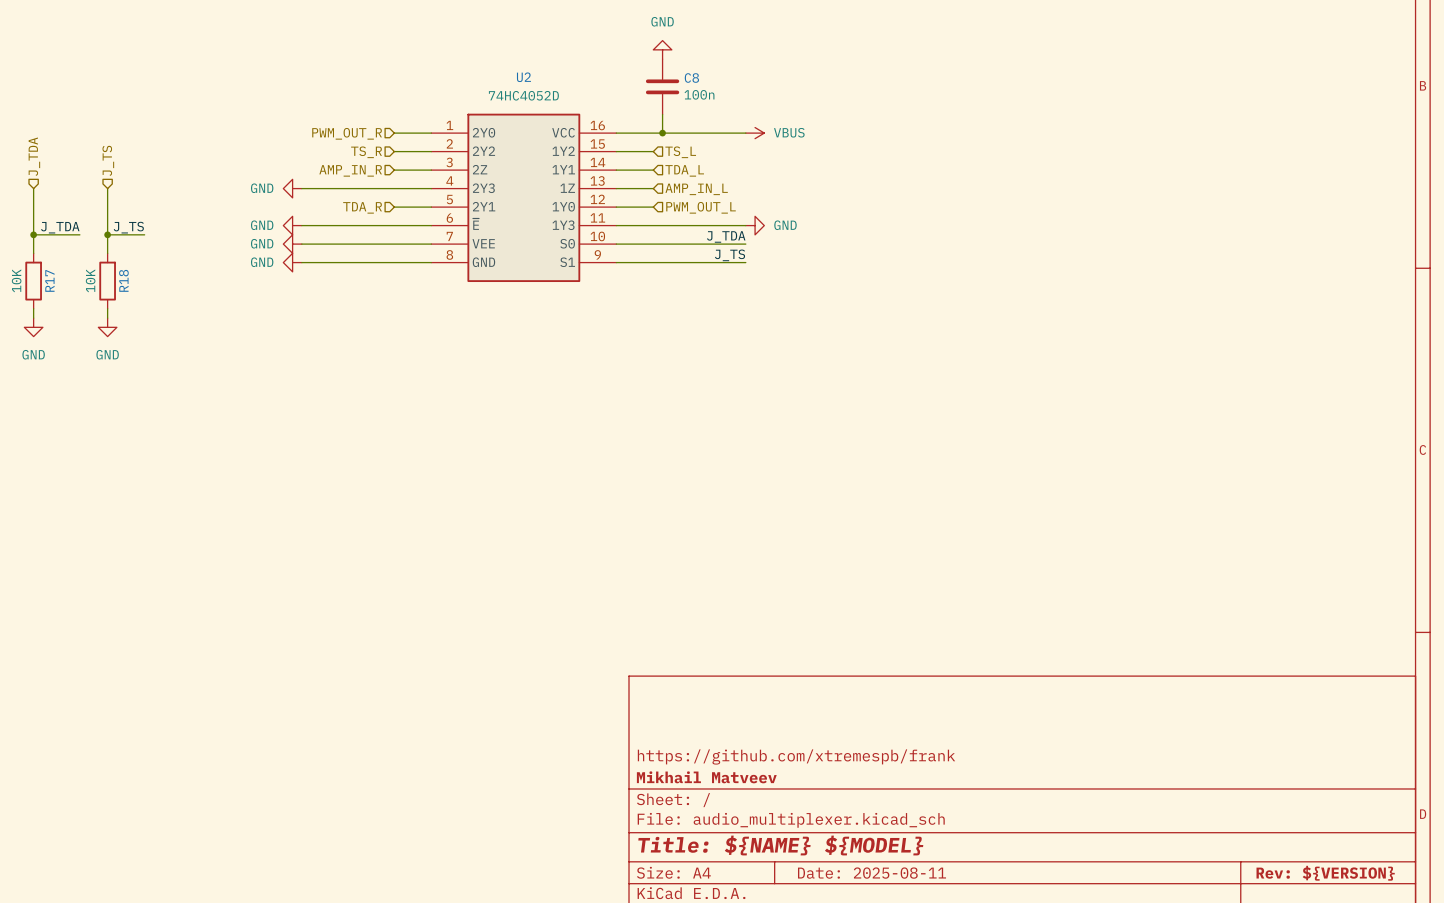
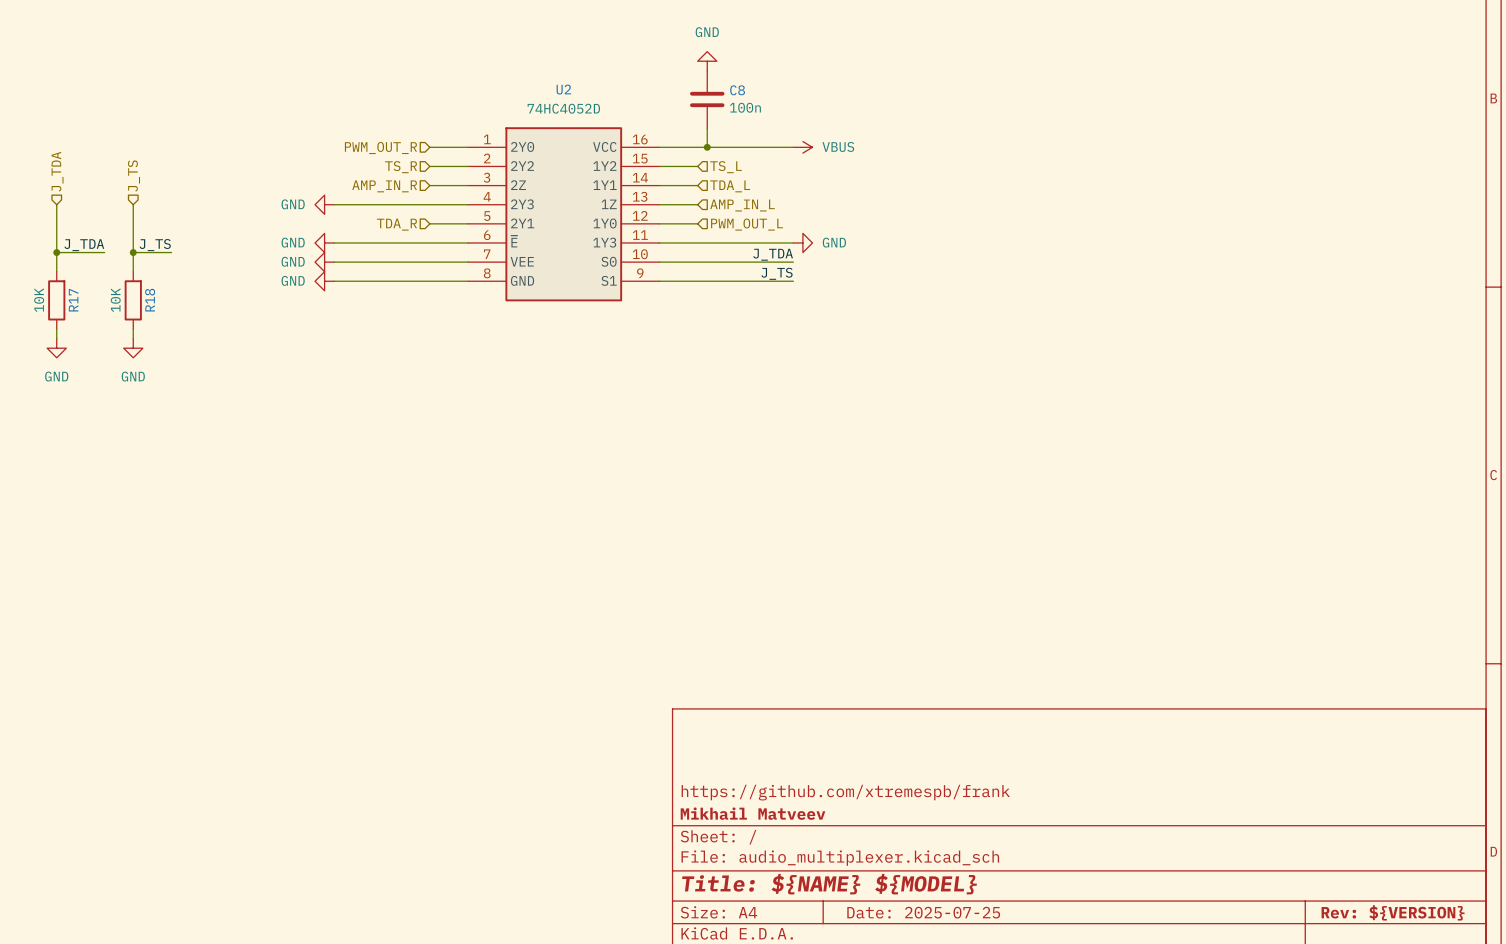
title block: Date: 2025-08-11 (872, 873) -> Date: 2025-07-25 (923, 912)

